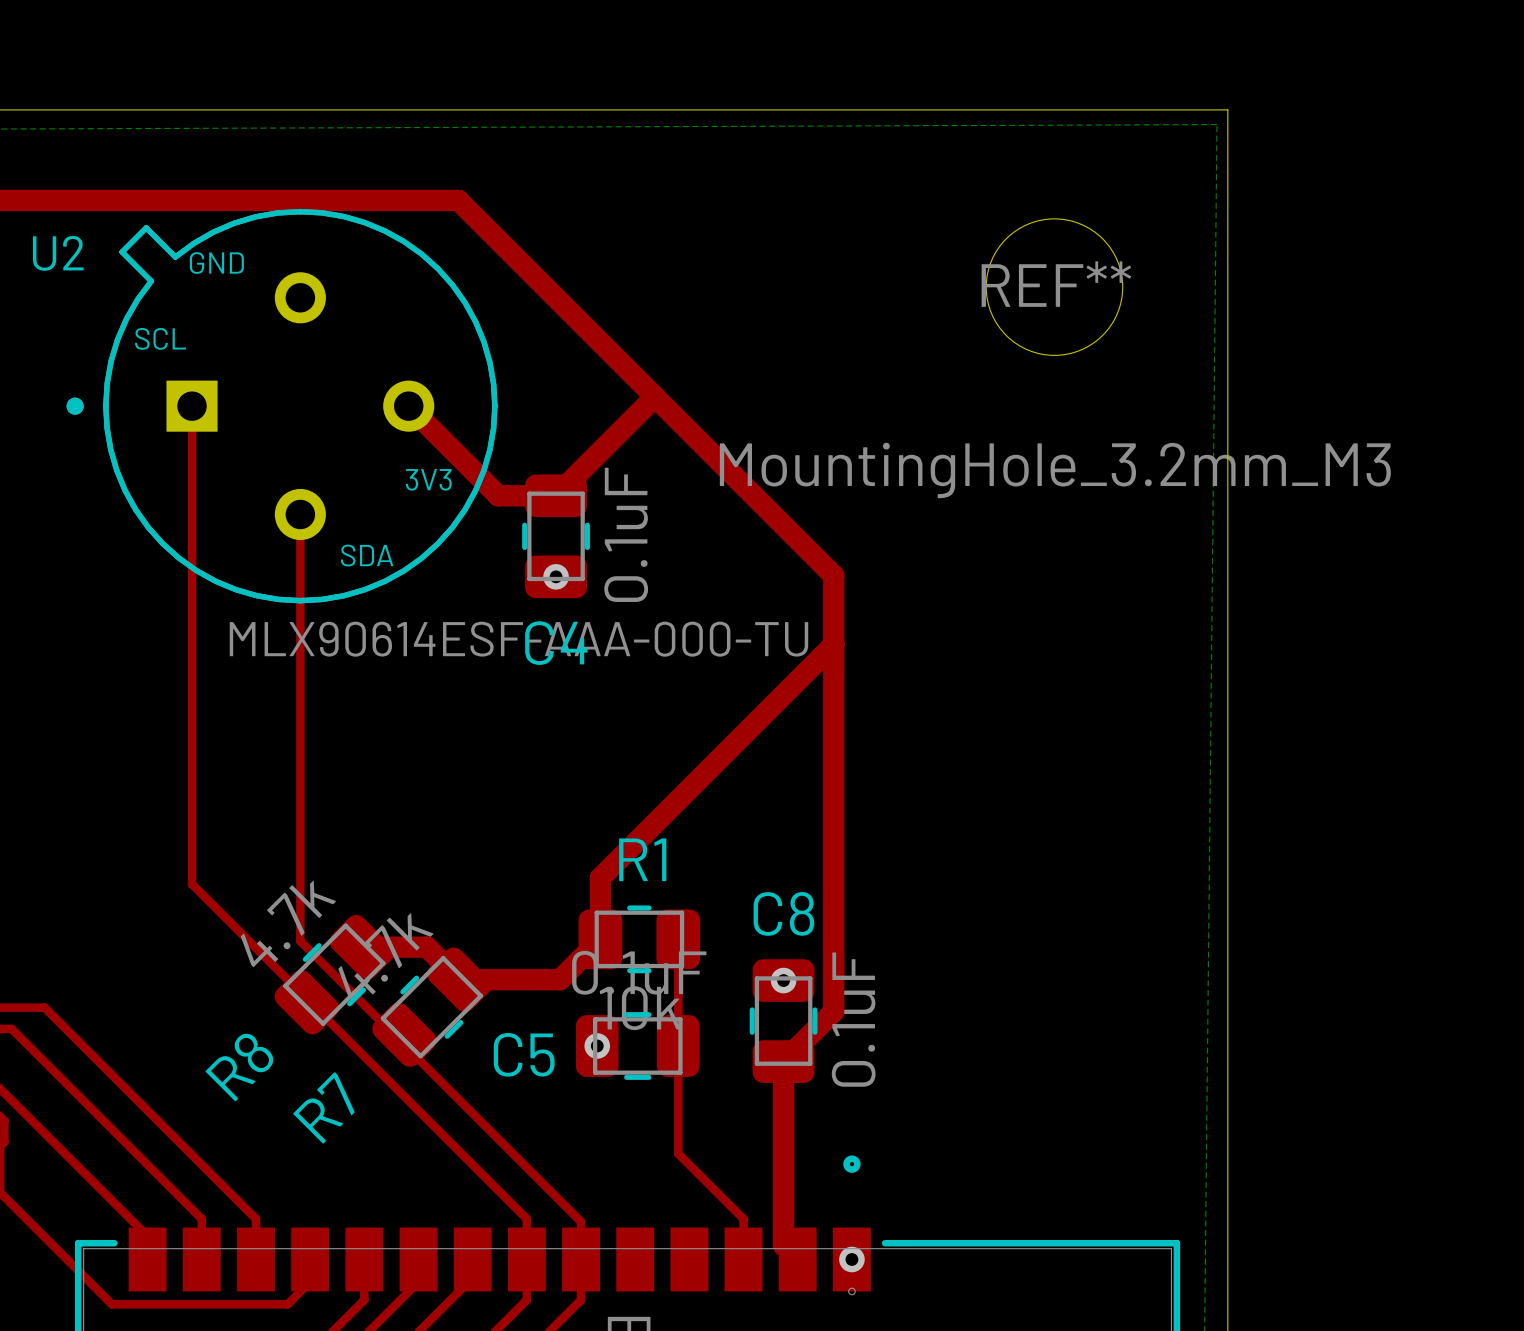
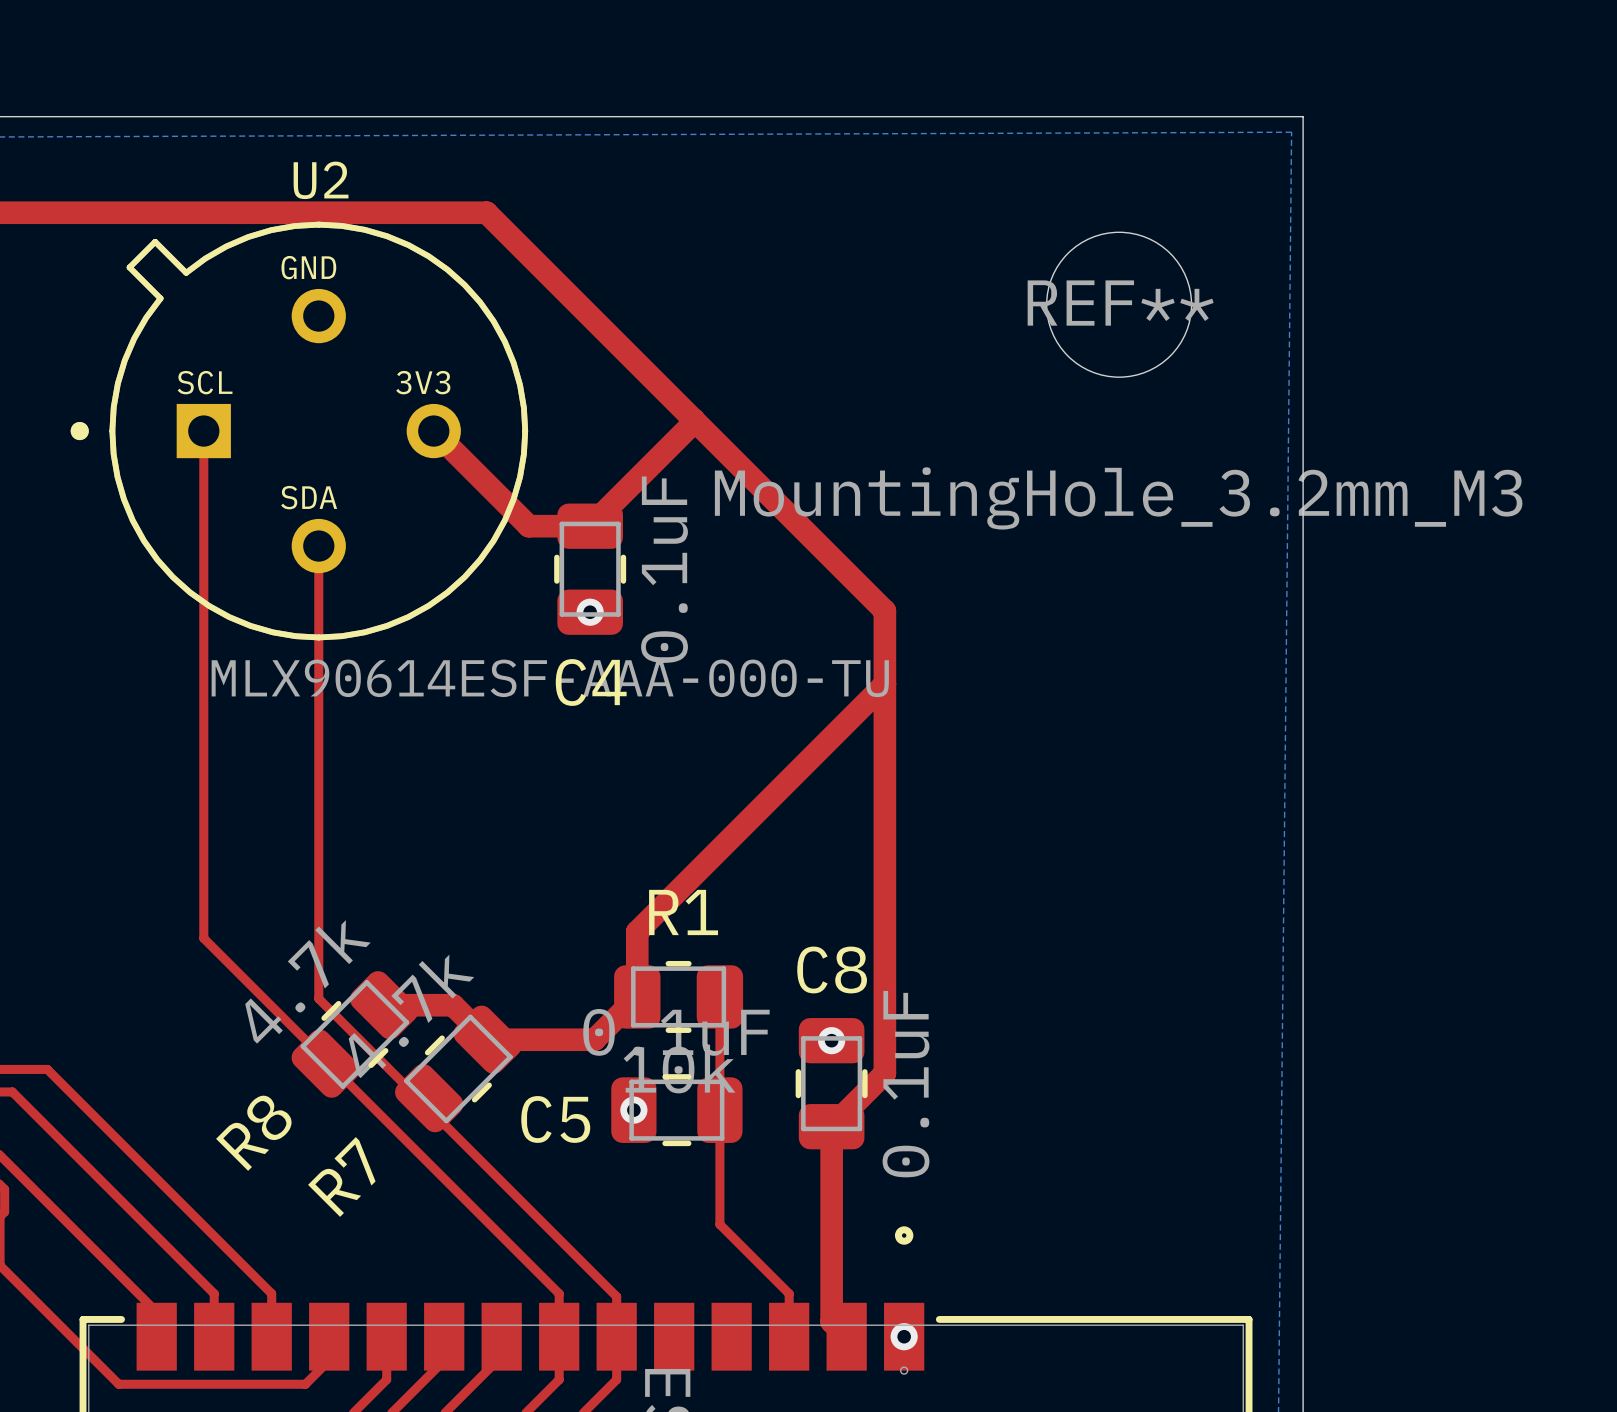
U2 name position: U2 (58, 253) -> U2 (321, 180)
text position: GND (216, 263) -> GND (308, 267)
text position: SCL (160, 338) -> SCL (205, 382)
text position: 3V3 (428, 479) -> 3V3 (423, 382)
text position: SDA (367, 555) -> SDA (309, 497)

